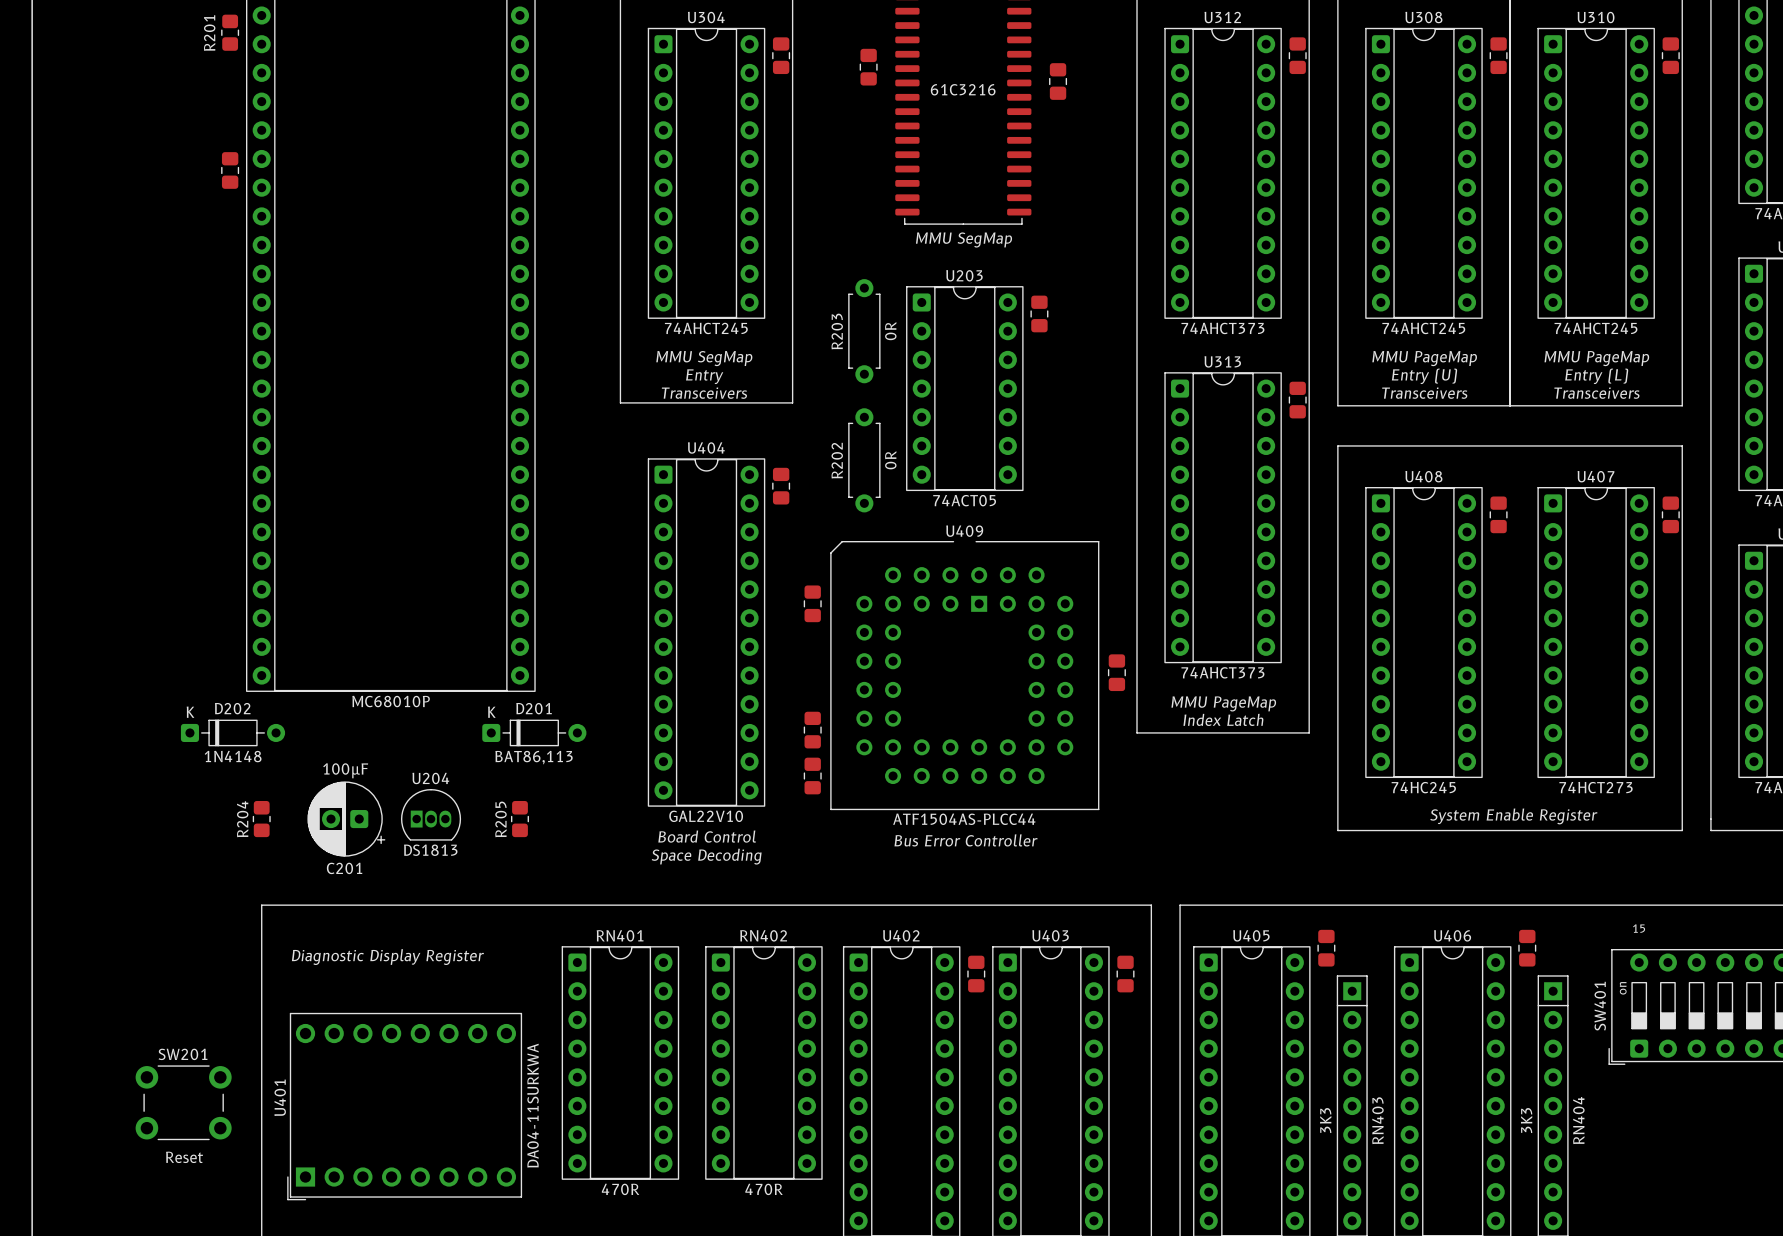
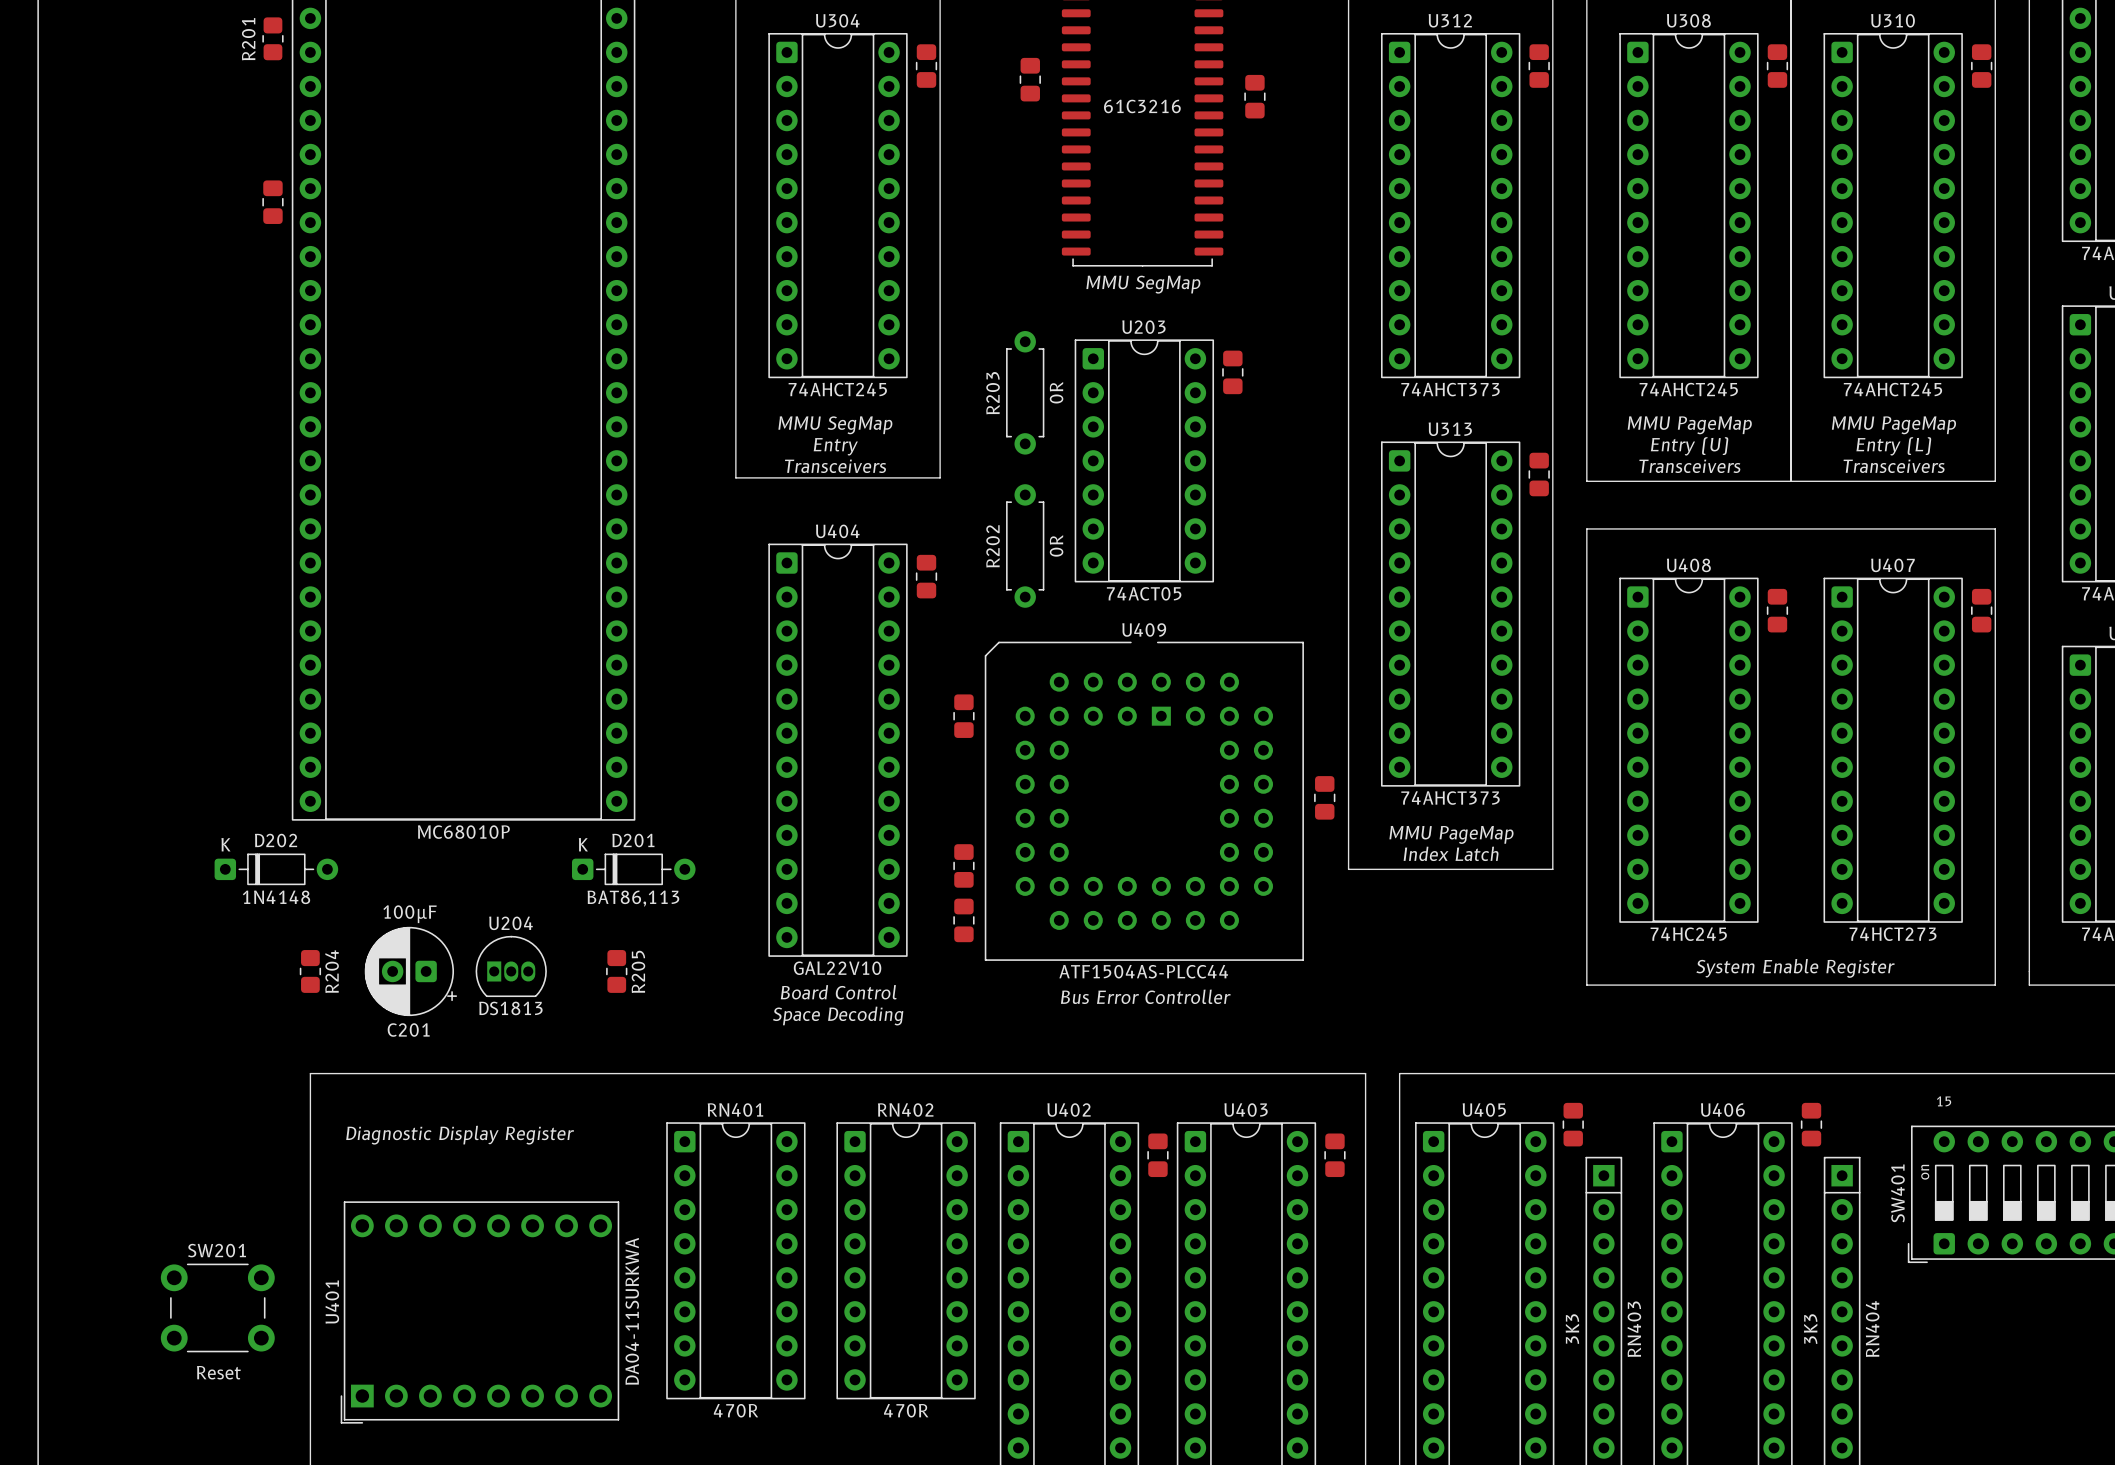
R204 name position: R204 (242, 819) -> R204 (332, 971)
R205 name position: R205 (501, 819) -> R205 (638, 971)

